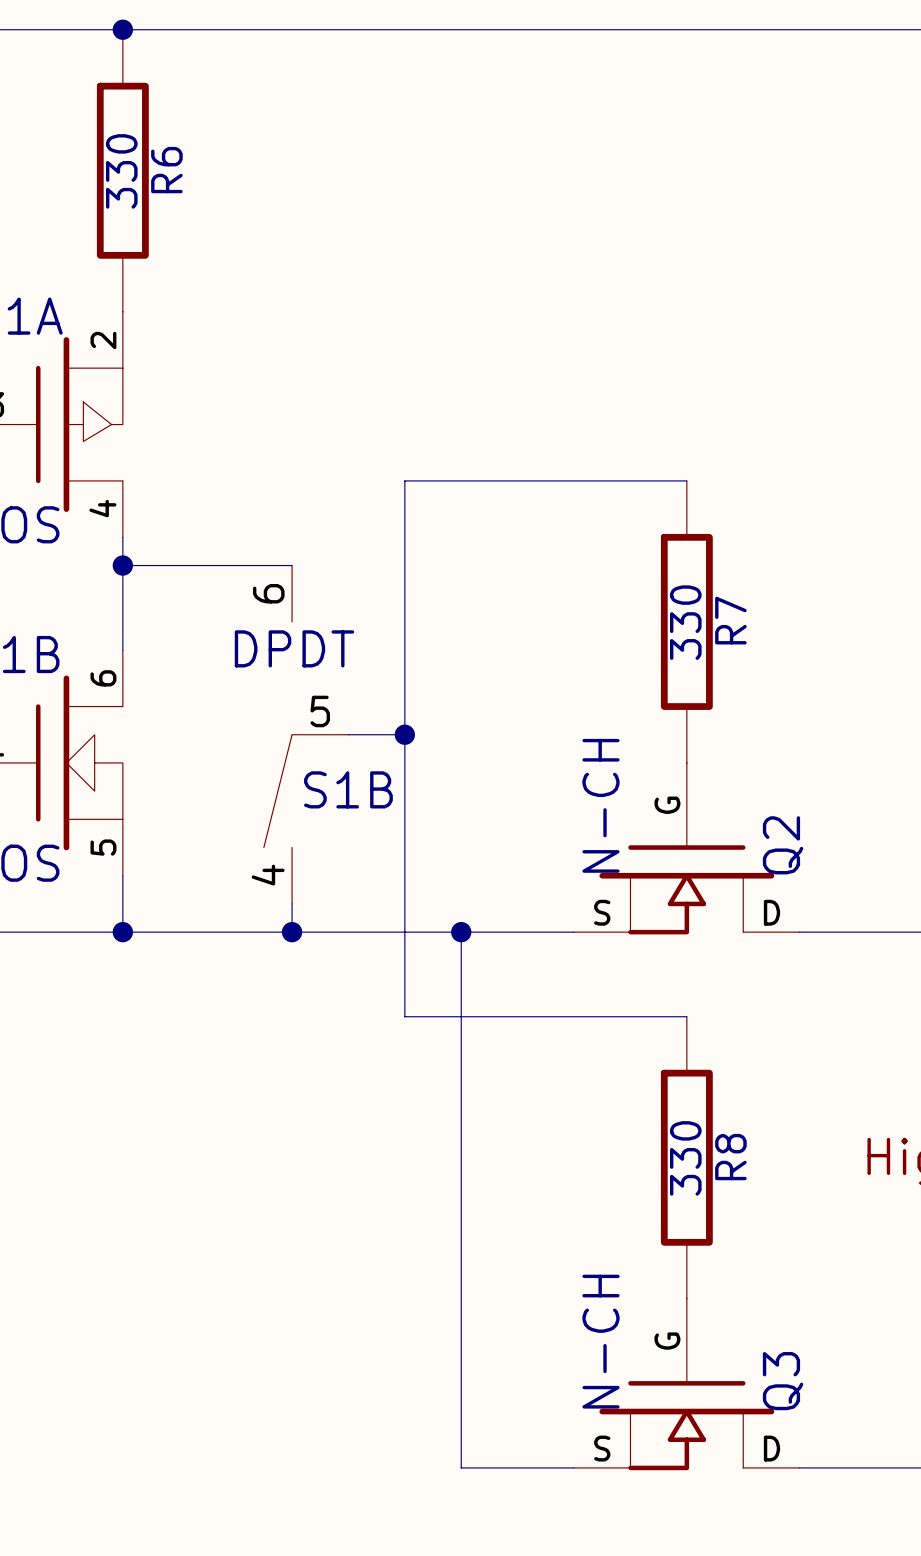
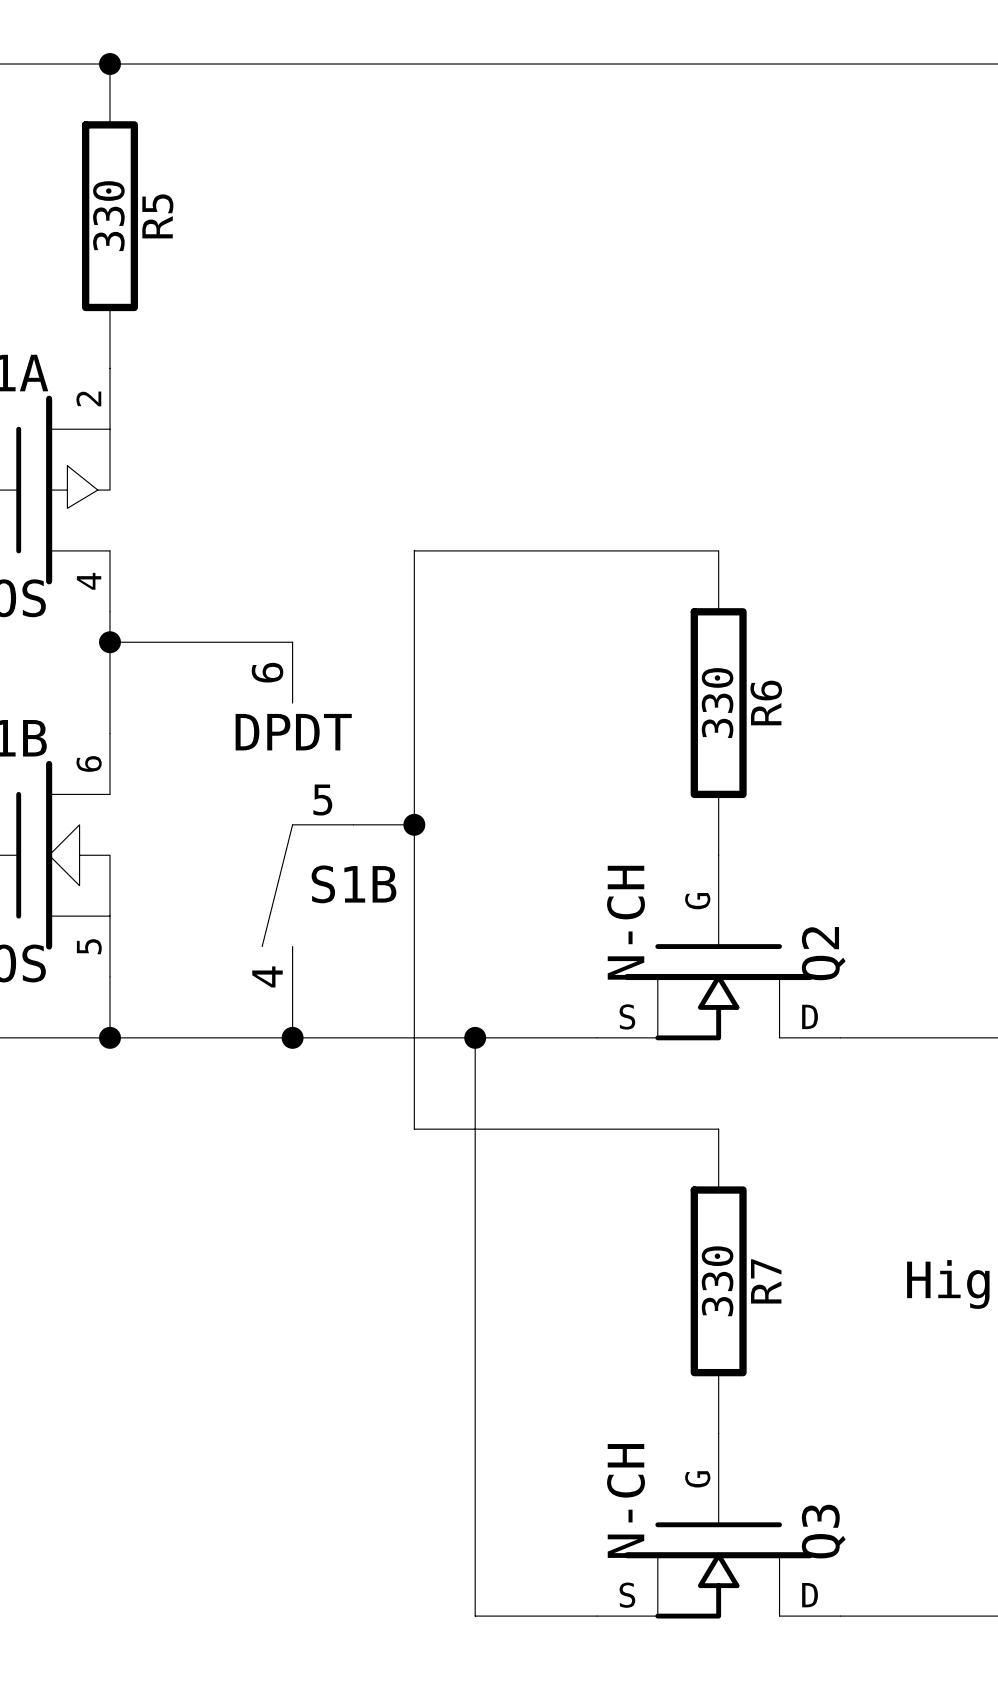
R6 name: R6 (166, 170) -> R5 (157, 216)
R7 name: R7 (730, 620) -> R6 (766, 702)
R8 name: R8 (730, 1157) -> R7 (766, 1281)

